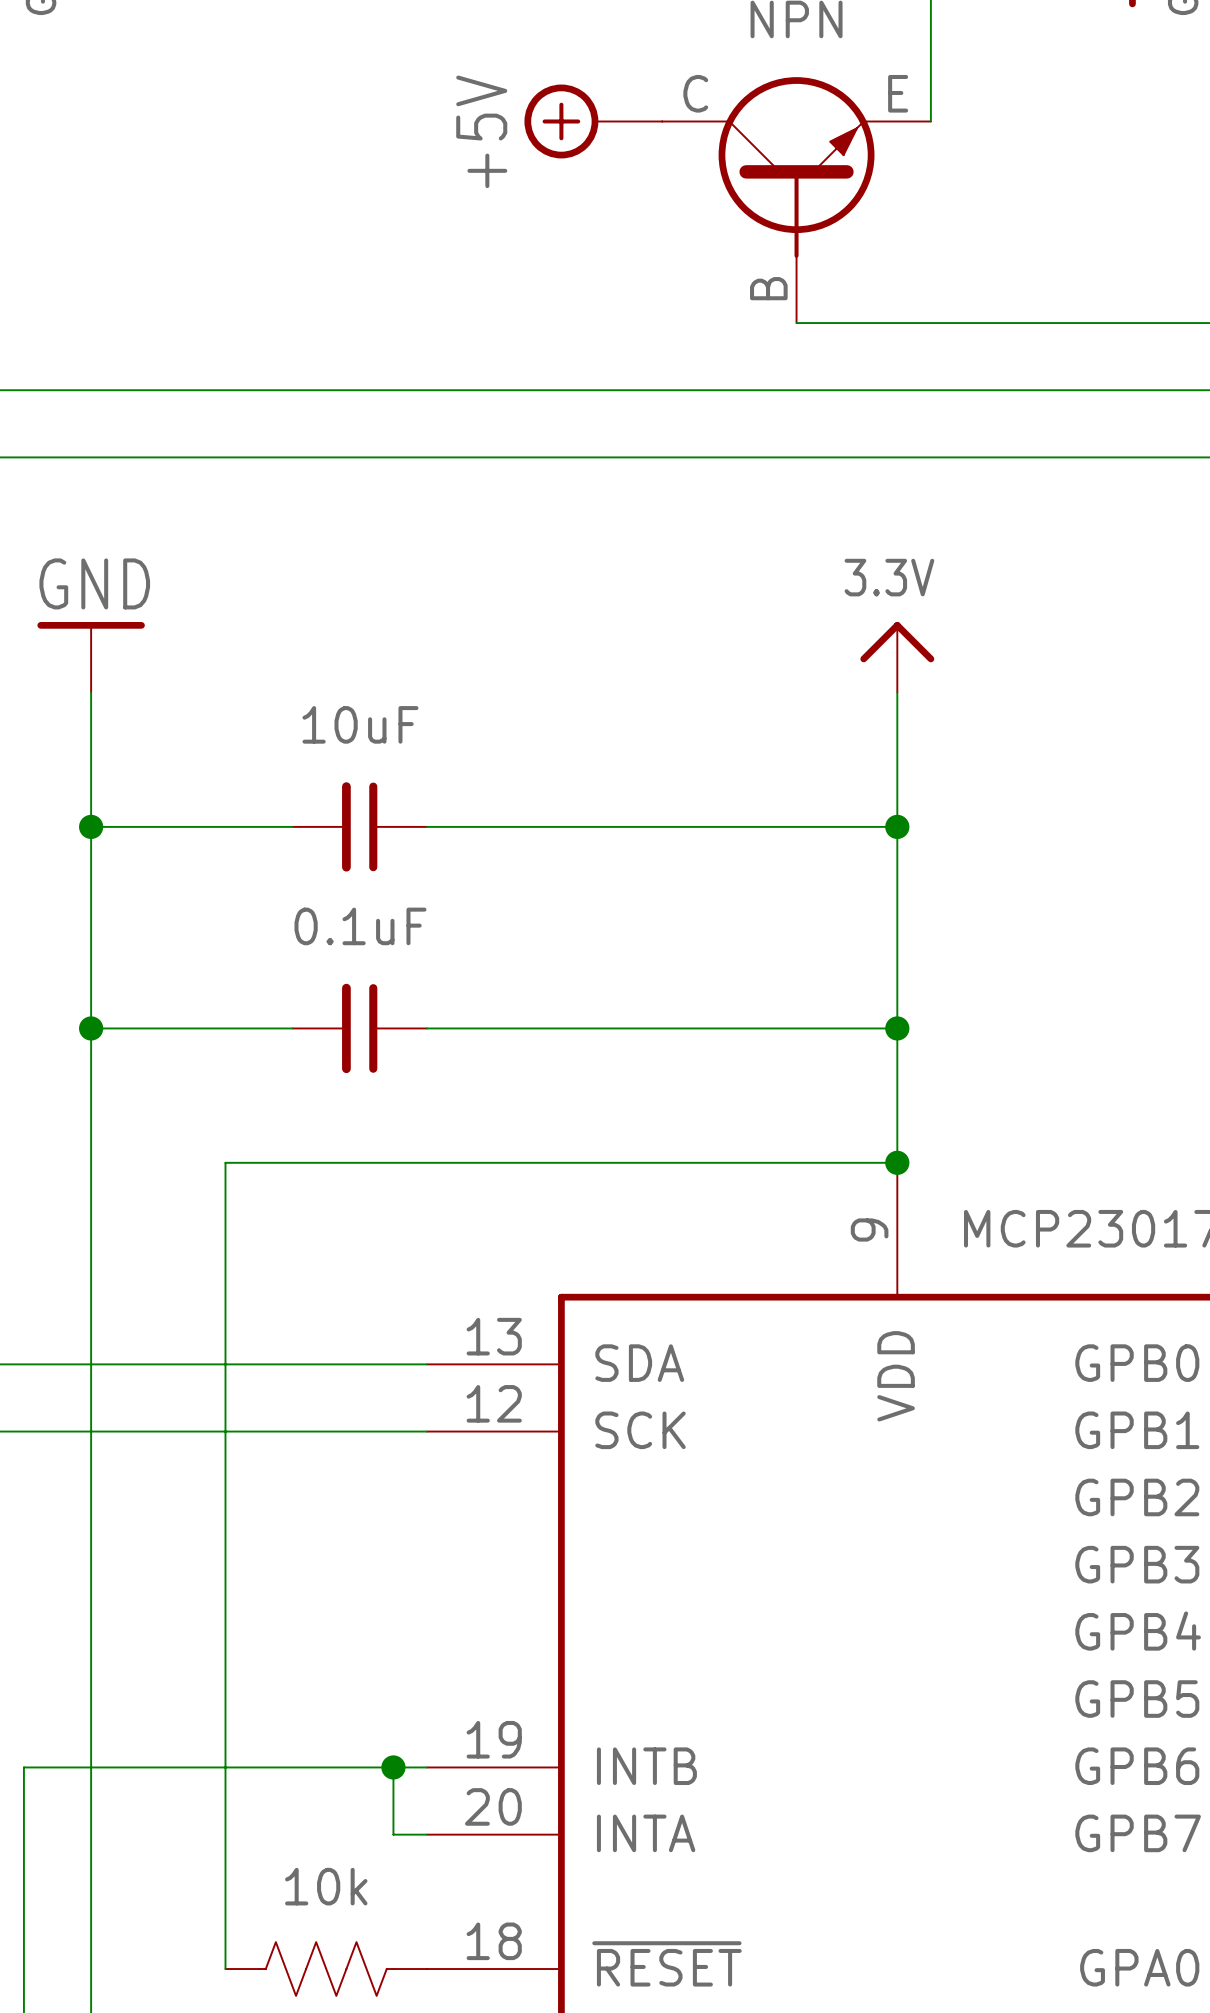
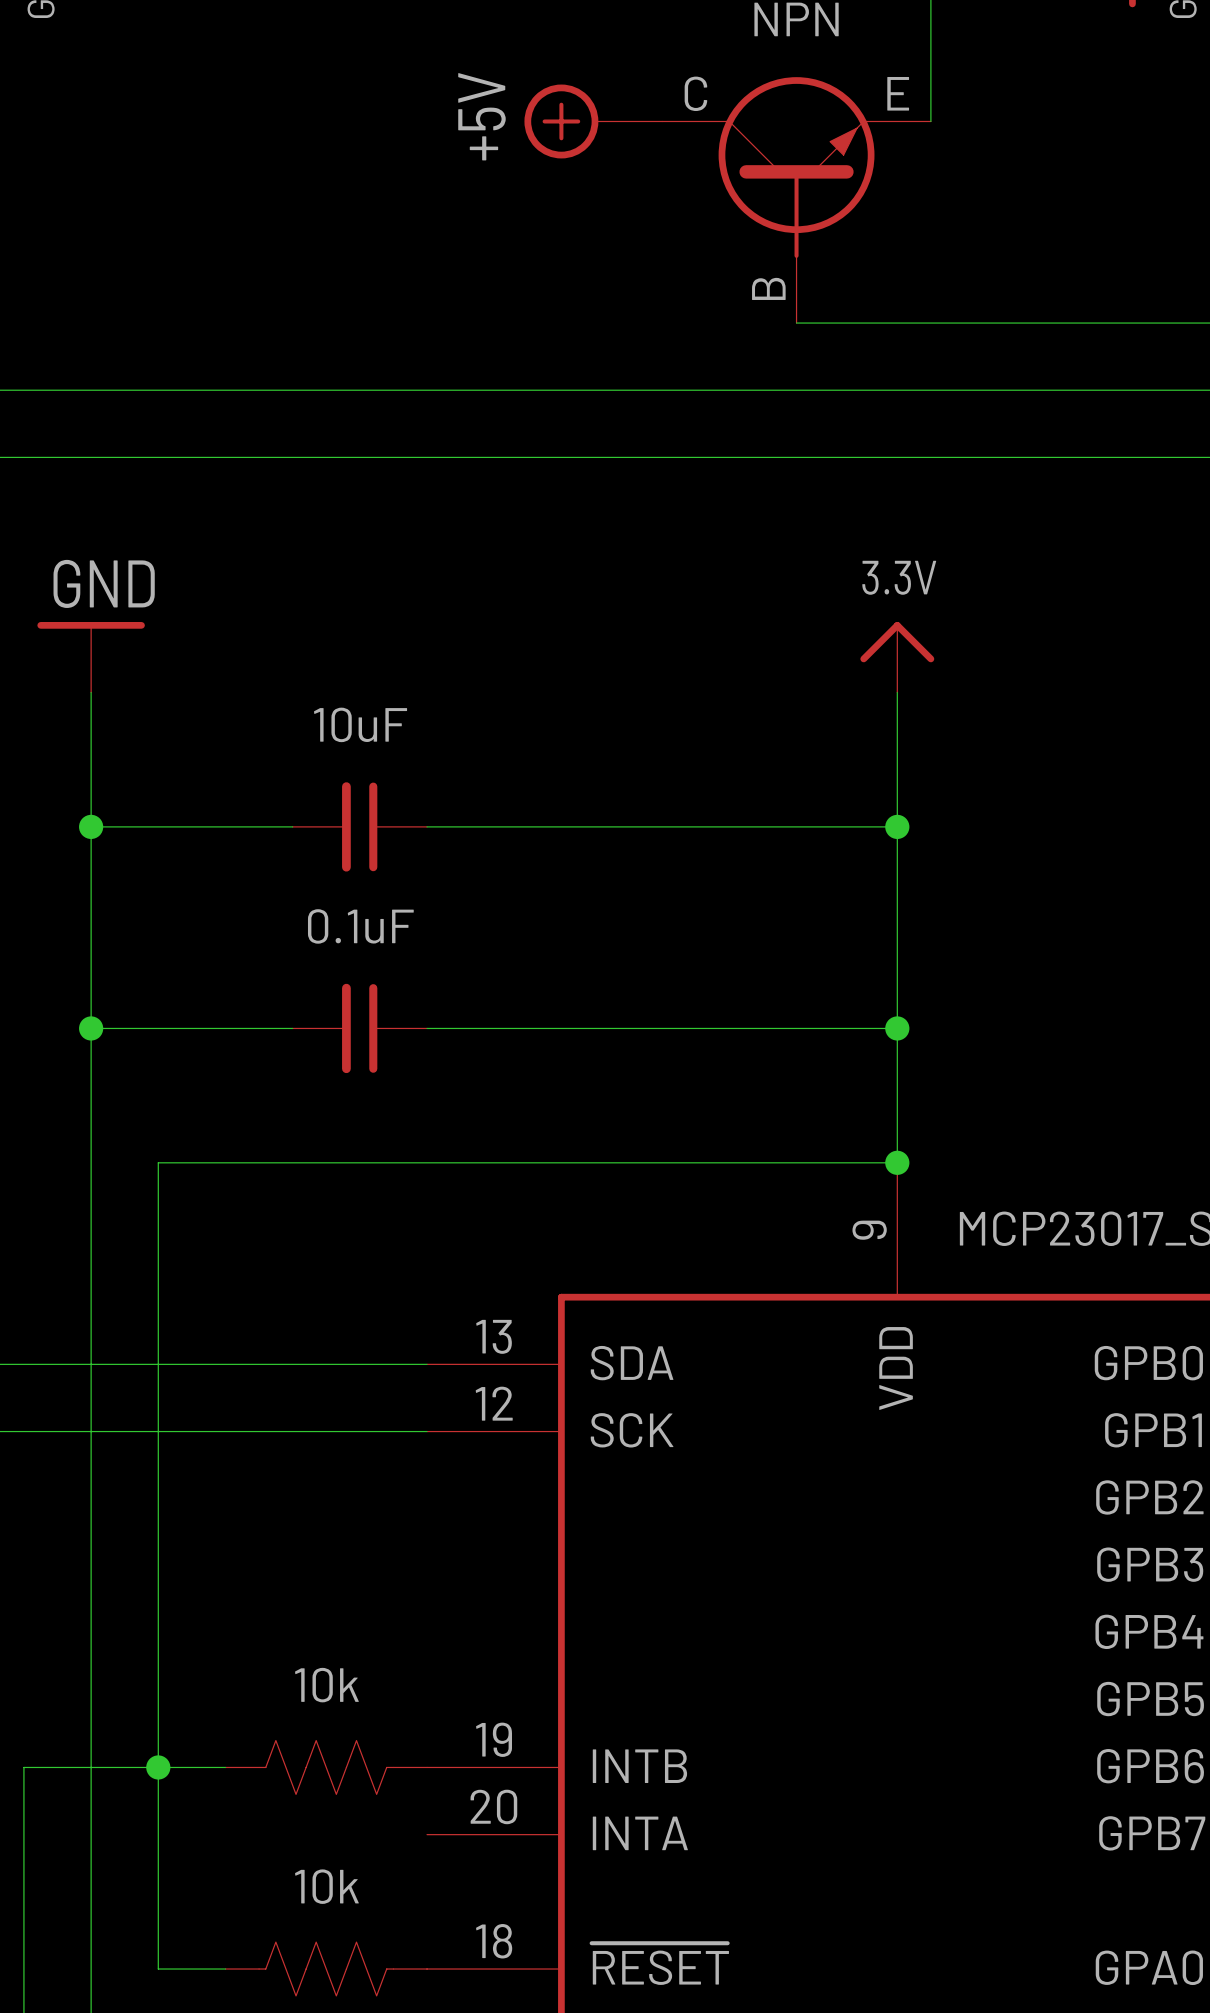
wire: (225, 1162) (225, 1969) -> (225, 1162) (158, 1162) (158, 1969) (225, 1969)
junction: none -> (158, 1767)
wire: (225, 1767) (427, 1767) -> none
part: none -> 10k (326, 1767)
wire: (393, 1767) (393, 1834) (427, 1834) -> none
junction: (393, 1767) -> none

